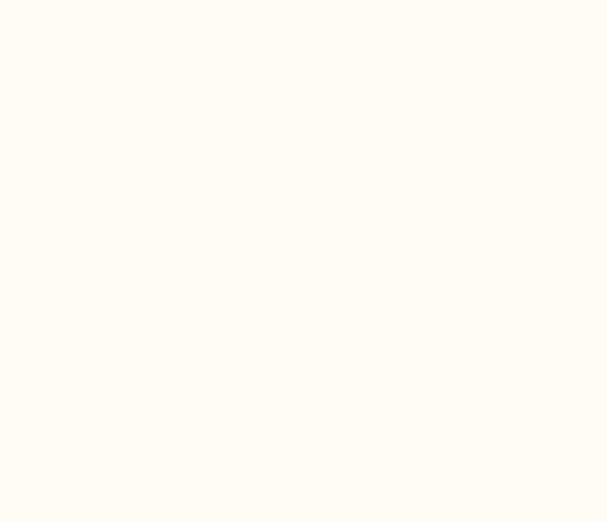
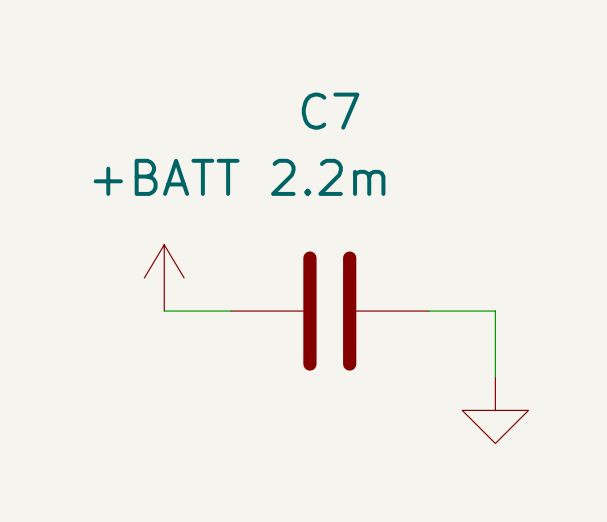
power symbol: none -> +BATT (164, 277)
wire: none -> (164, 311) (230, 311)
C7: none -> 2.2m (329, 311)
wire: none -> (429, 311) (495, 311) (495, 377)
power symbol: none -> (495, 410)

